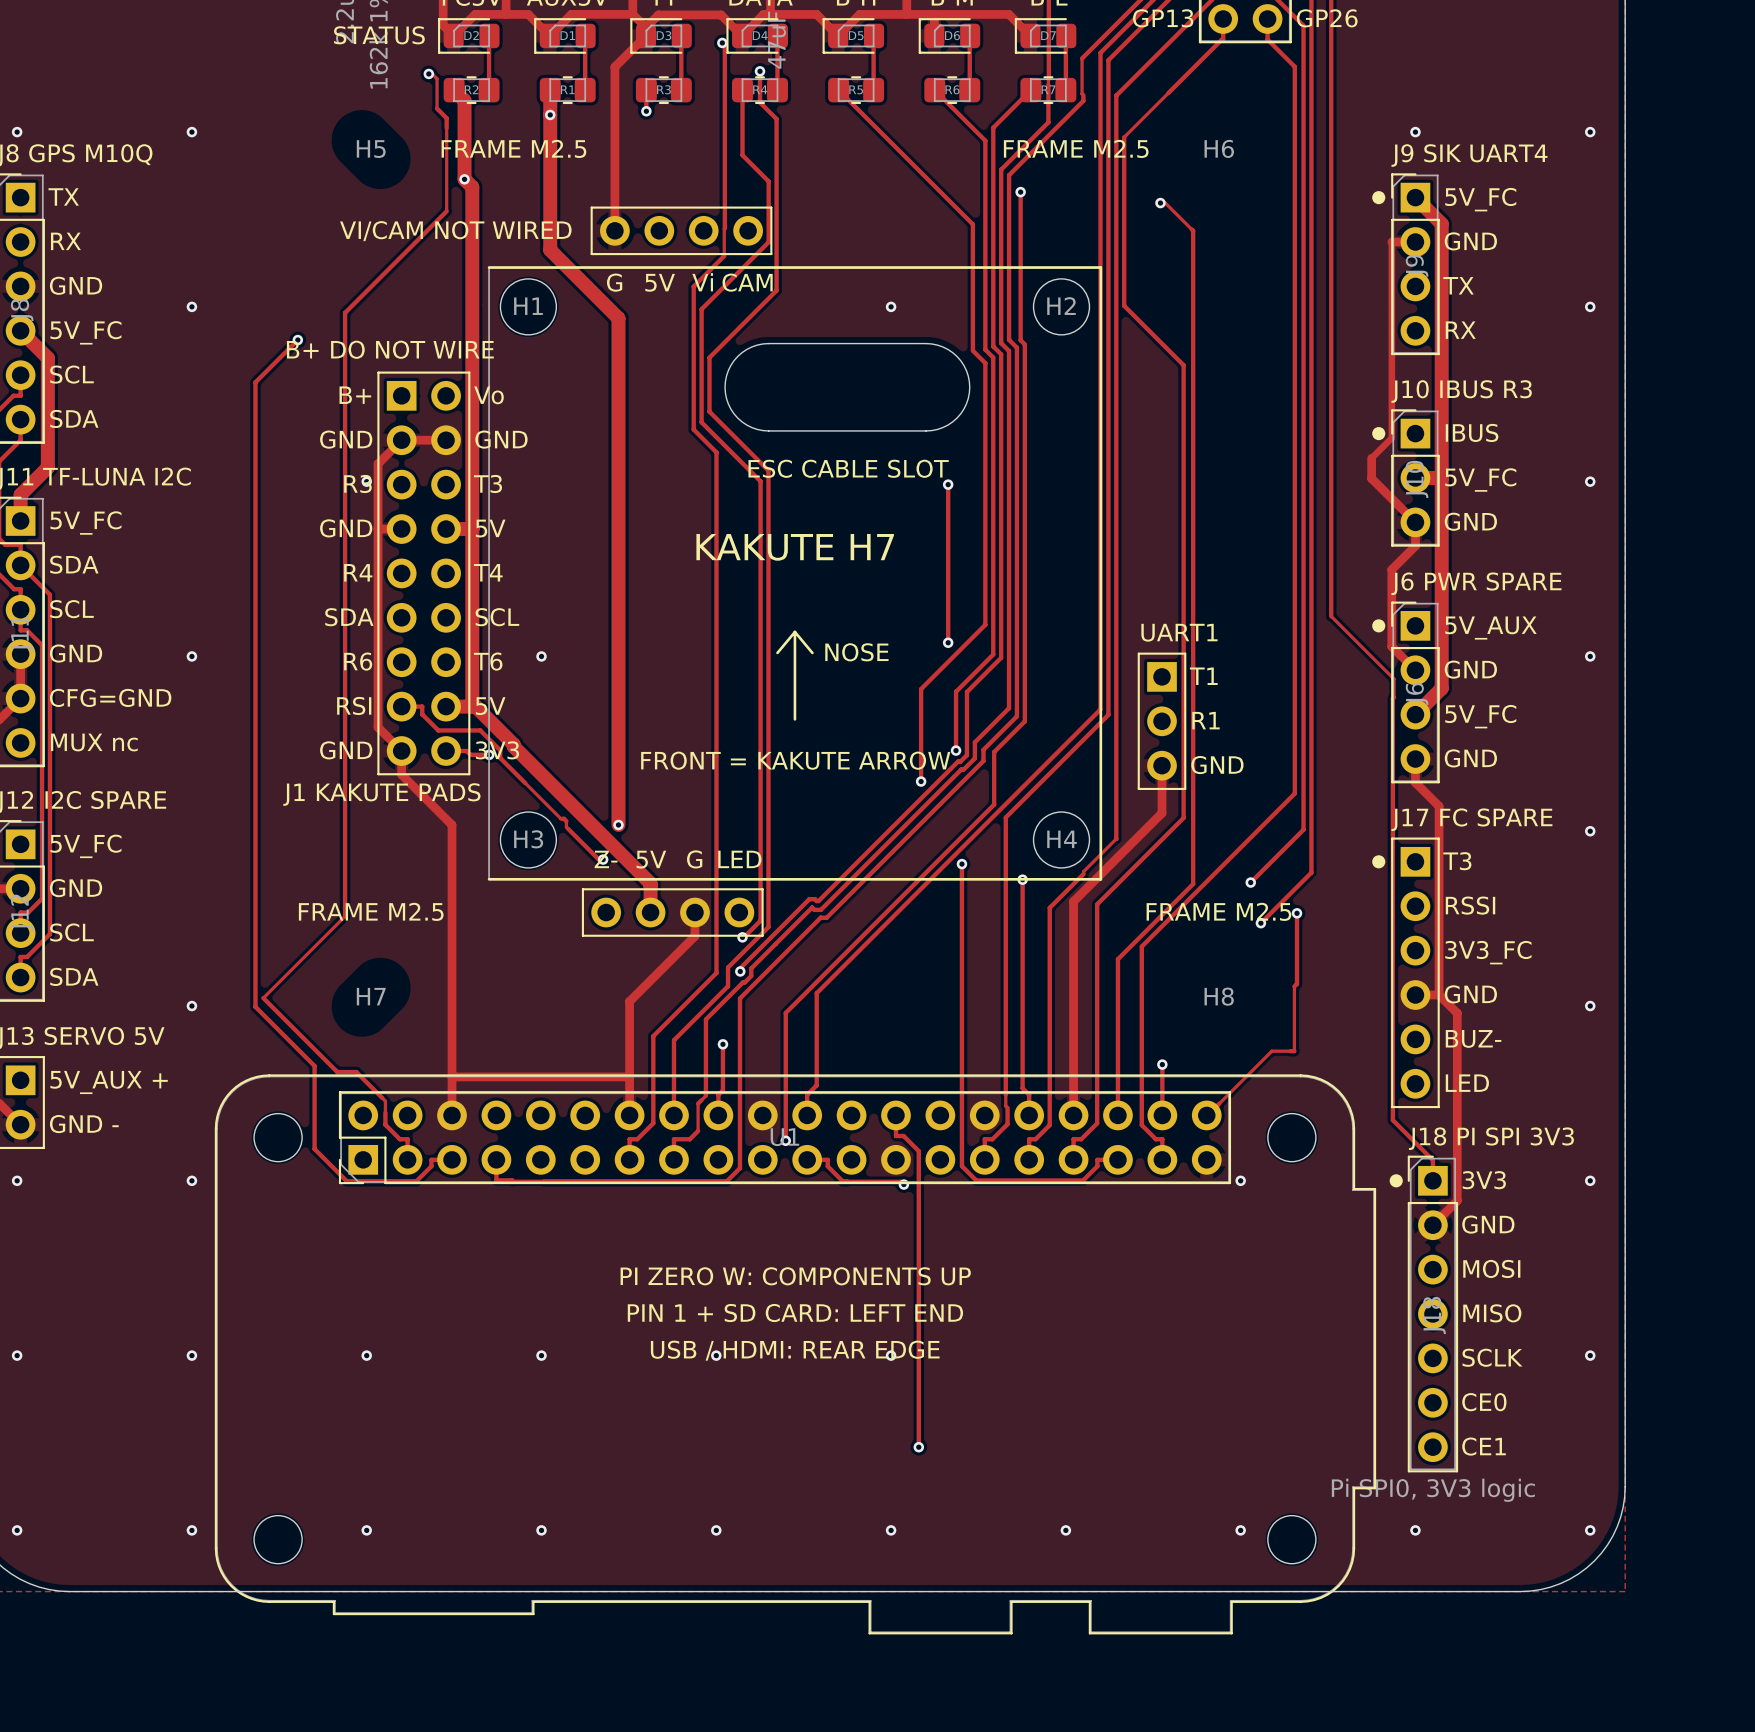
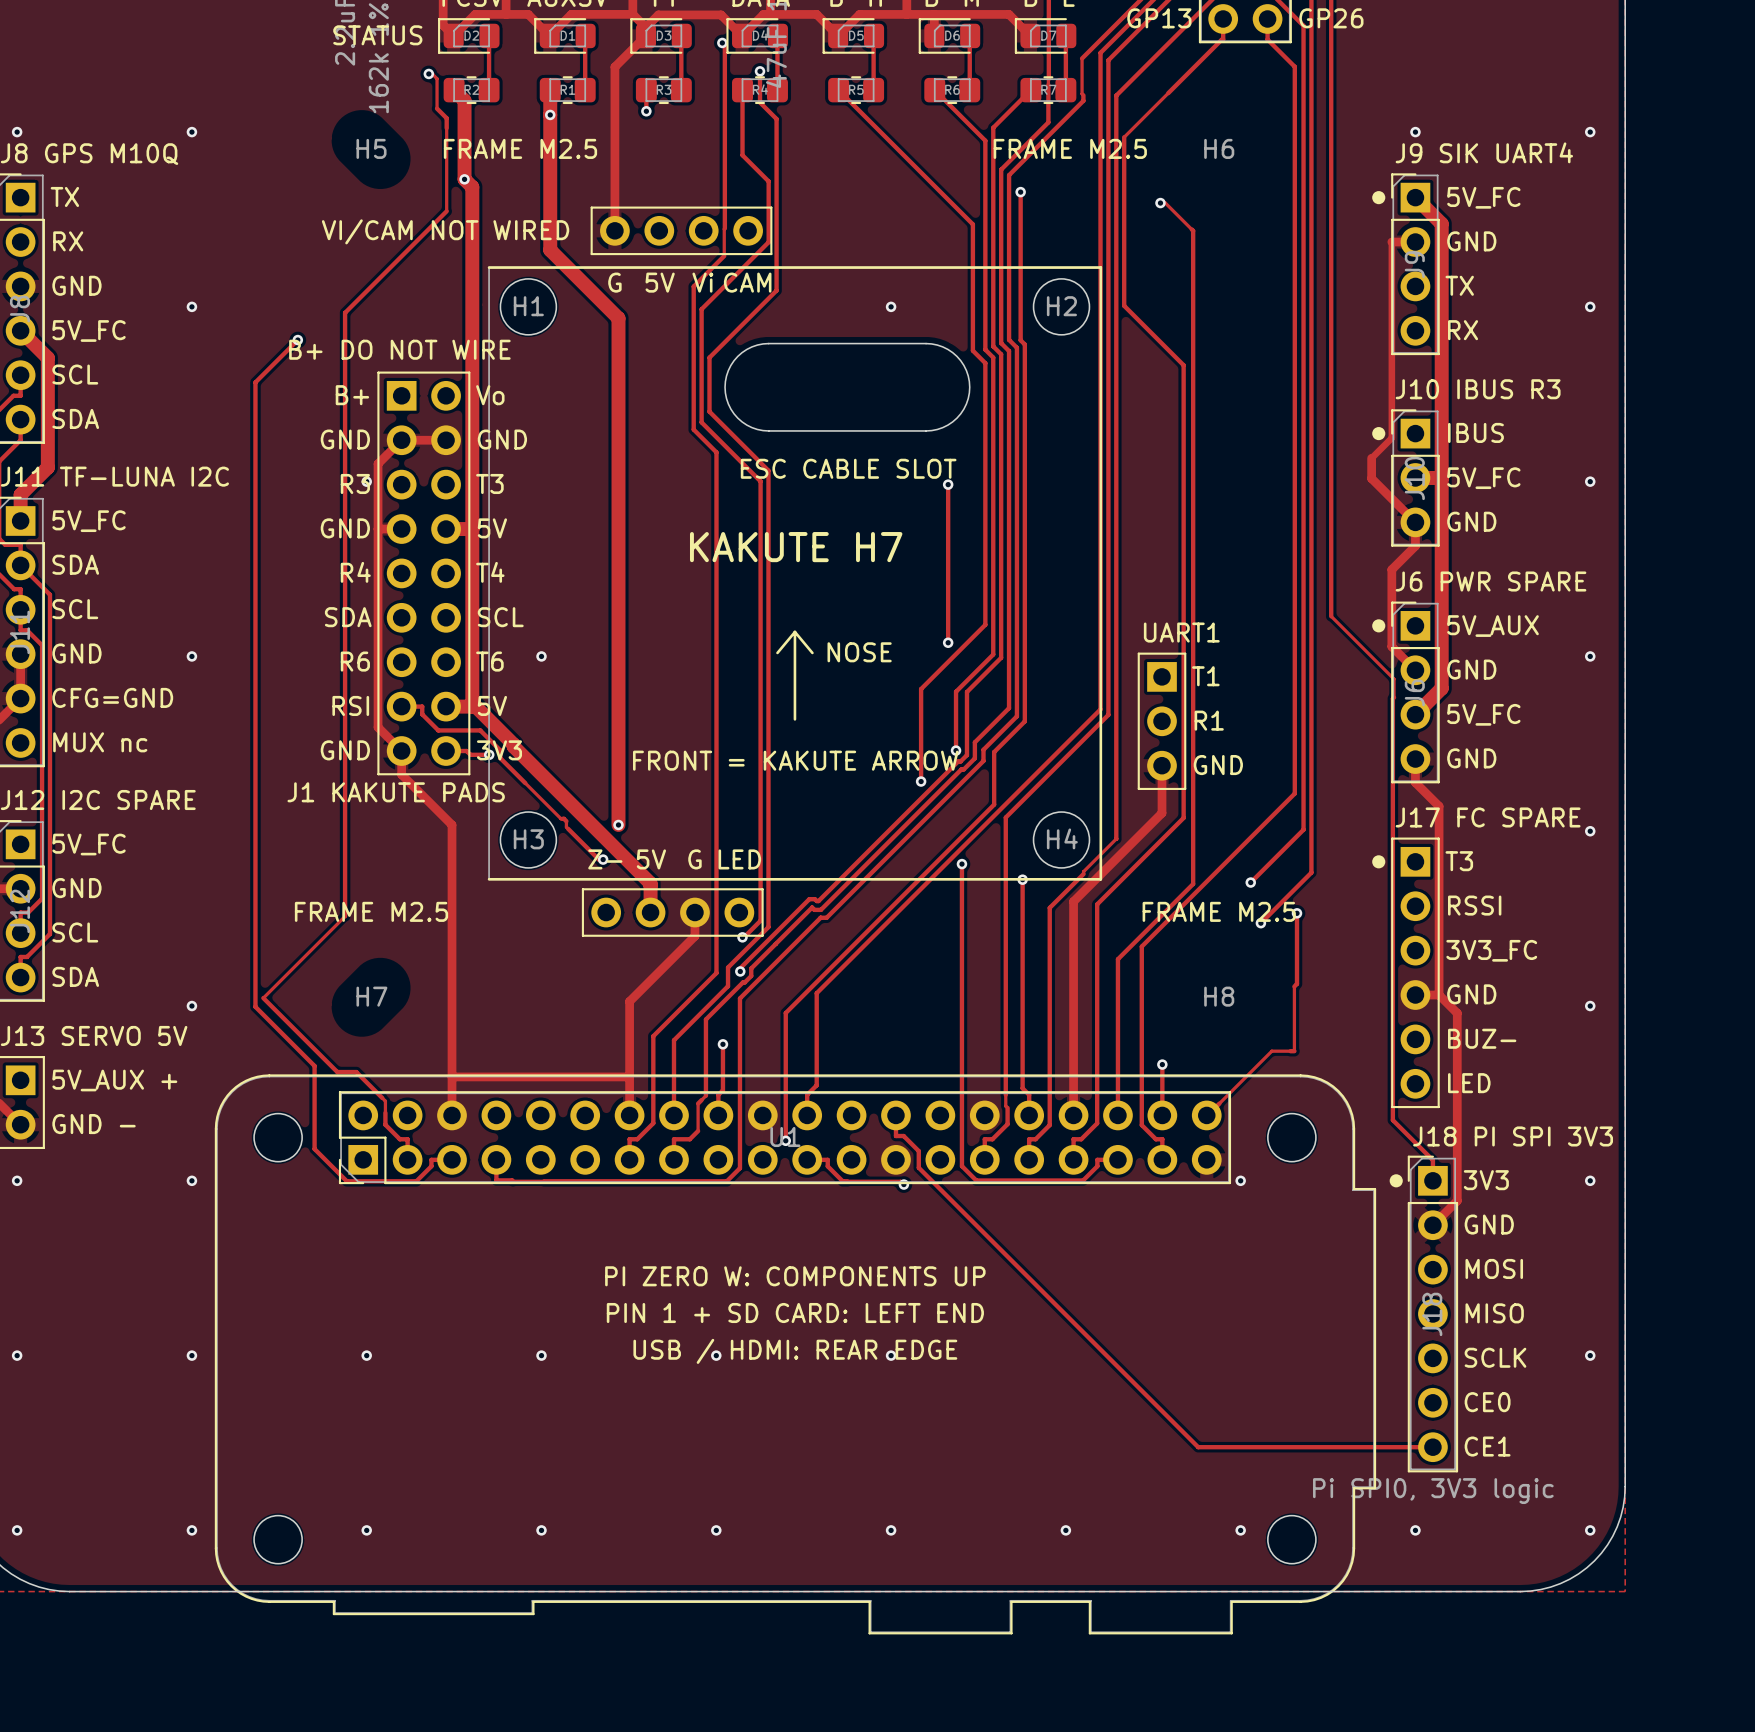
track: (918, 1167) (918, 1447) -> (918, 1167) (1198, 1447) (1432, 1447)
via: (918, 1447) -> none

